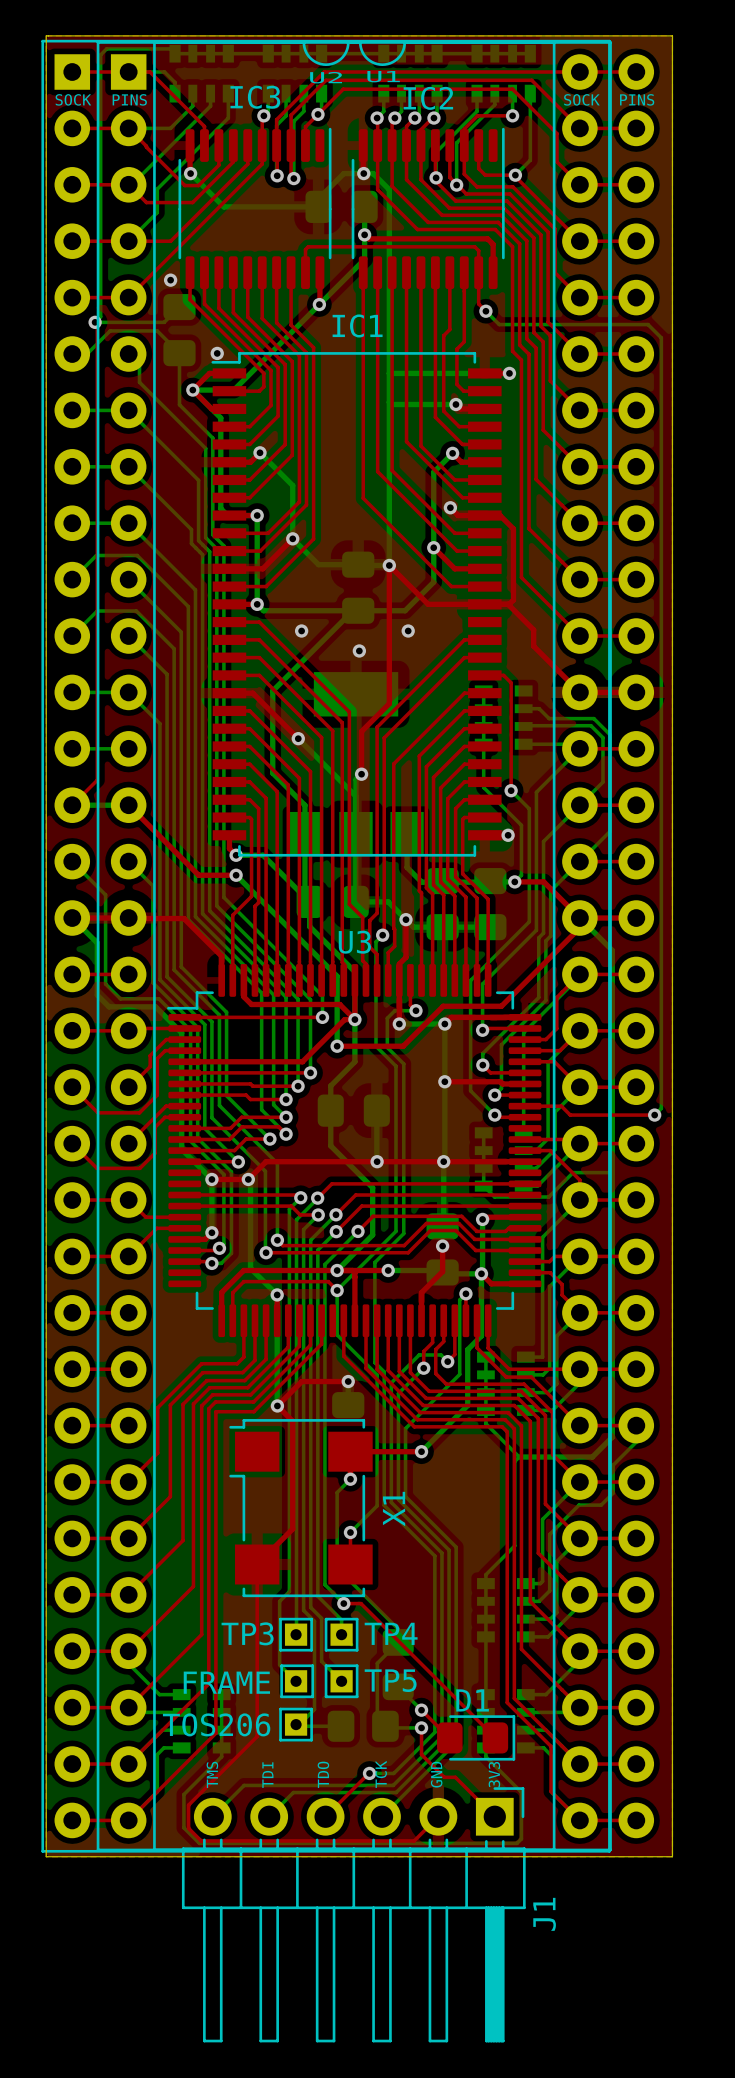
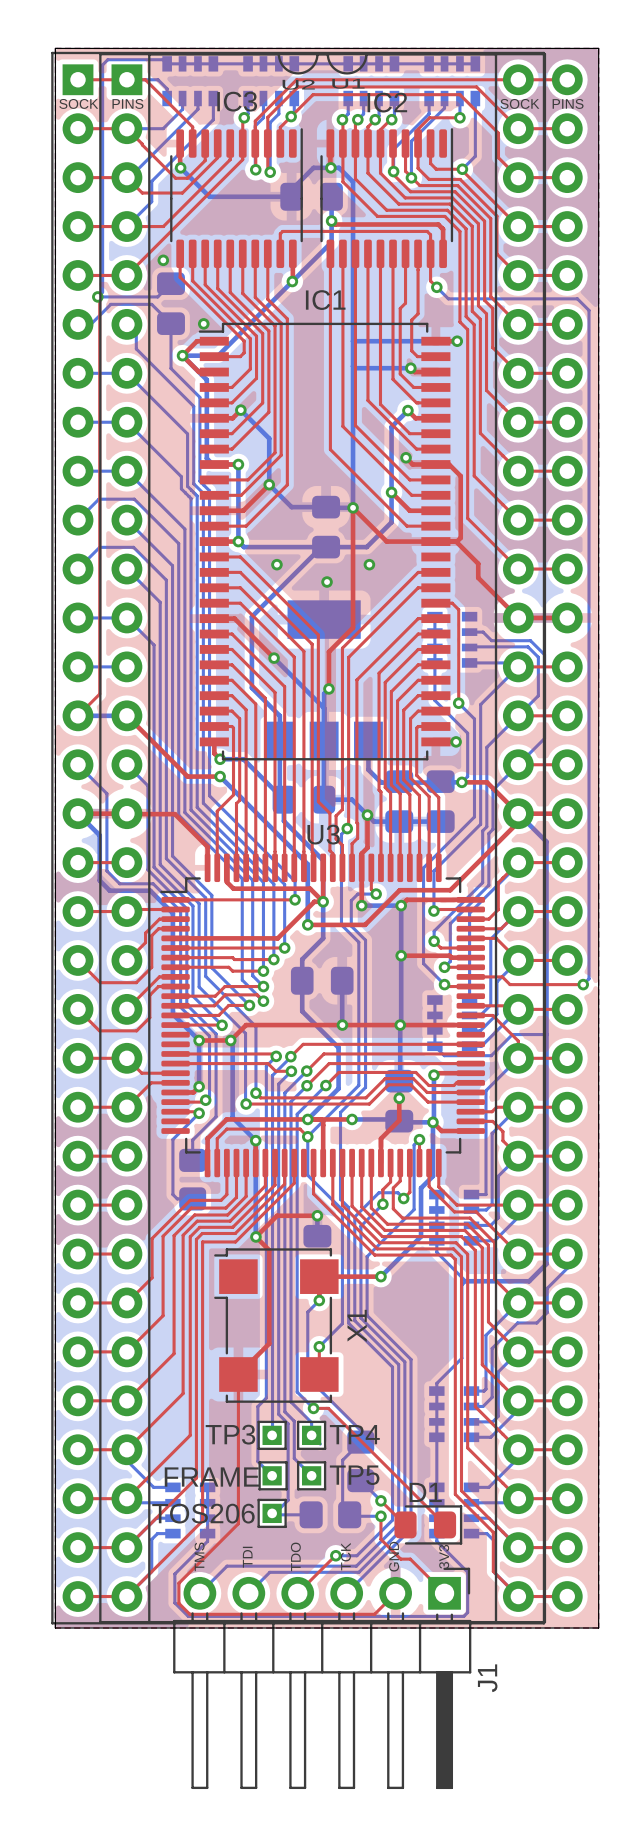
bottom track: (231, 1253) (221, 1263) (211, 1263) -> (216, 1104) (216, 1116) (192, 1140) (192, 1160)
bottom track: none -> (199, 1113) (172, 1139) (172, 1194) (177, 1198) (192, 1198)
part: none -> (192, 1179)

